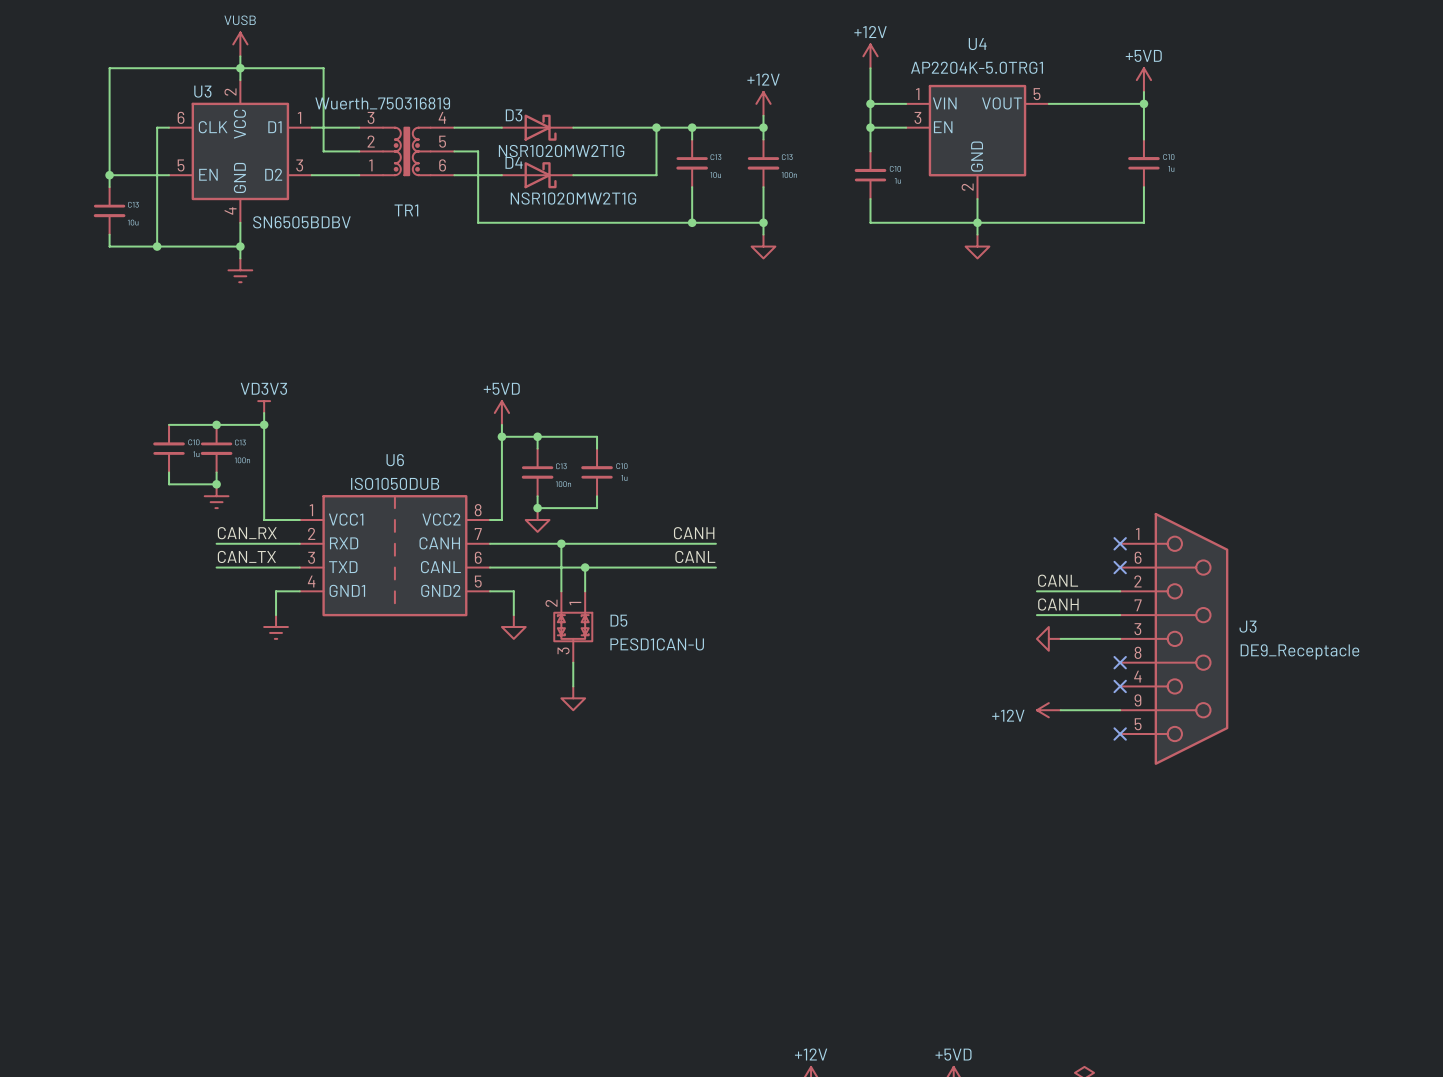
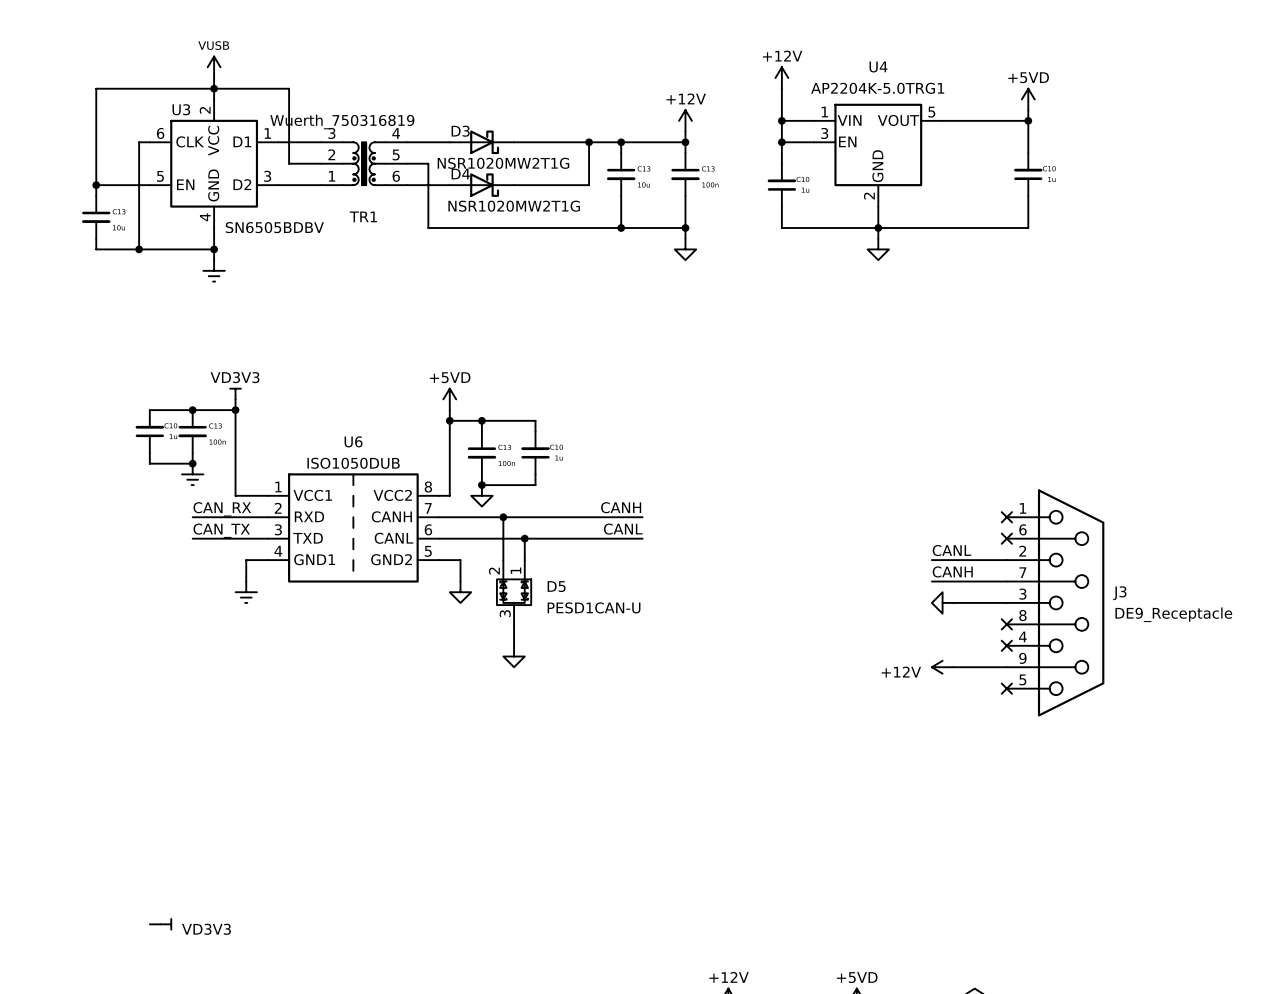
wire: none -> (149, 924) (160, 924)
power symbol: none -> VD3V3 (165, 924)

